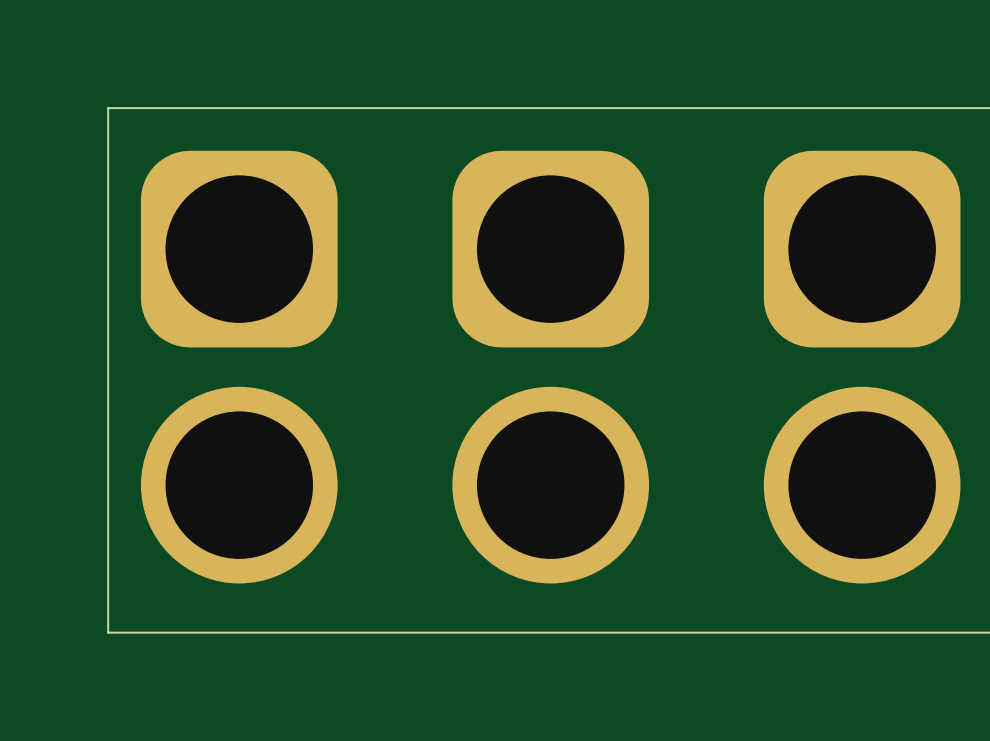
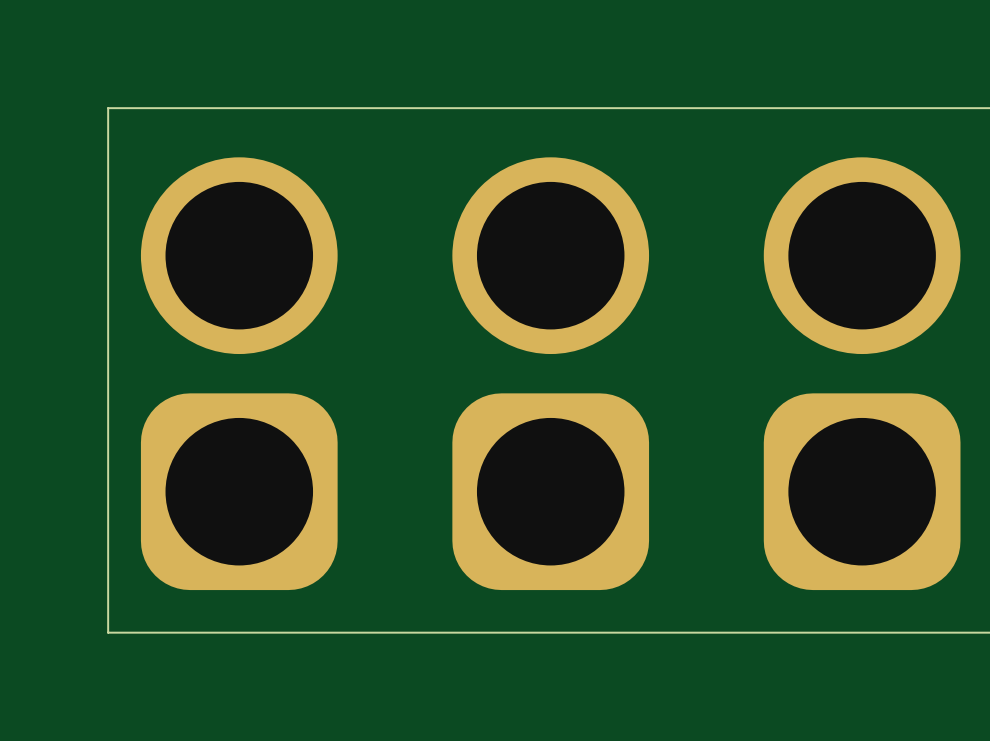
part rotation: 0° (239, 367) -> 180° (239, 373)
part rotation: 0° (550, 367) -> 180° (550, 373)
part rotation: 0° (862, 367) -> 180° (862, 373)

